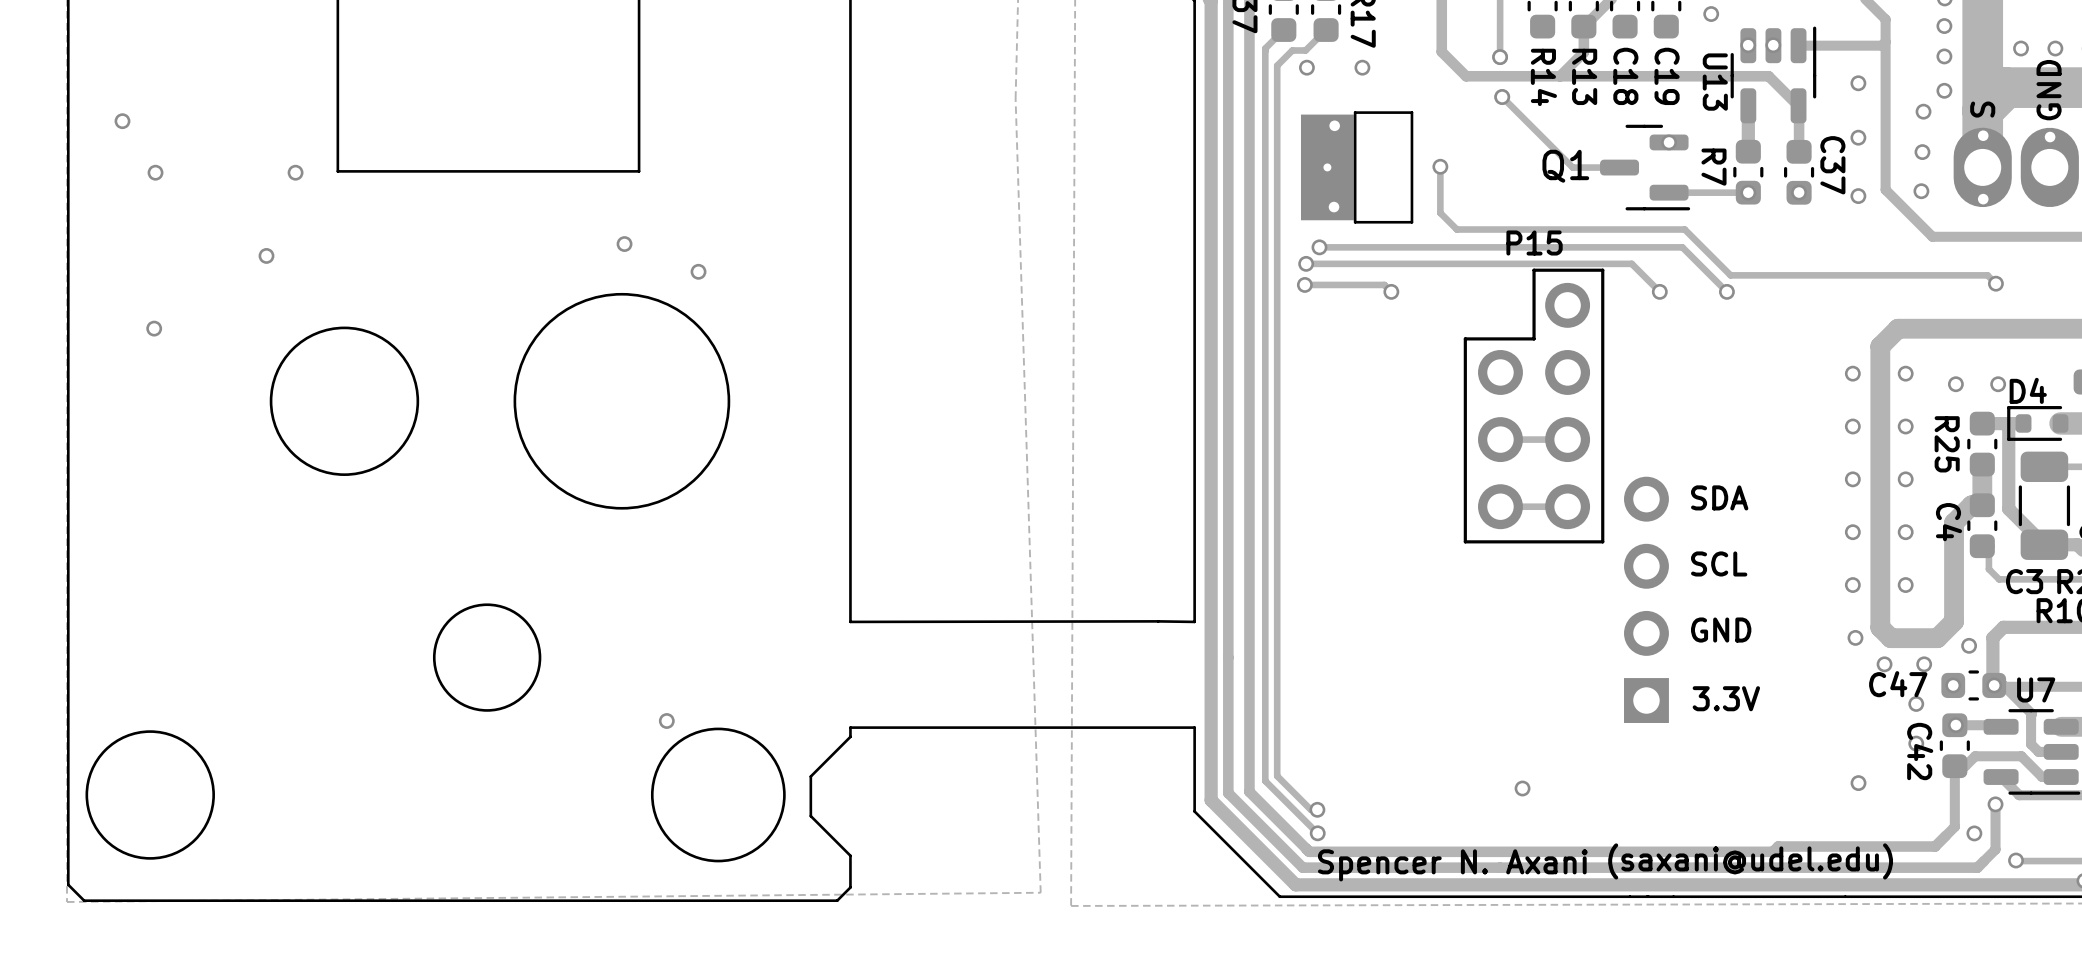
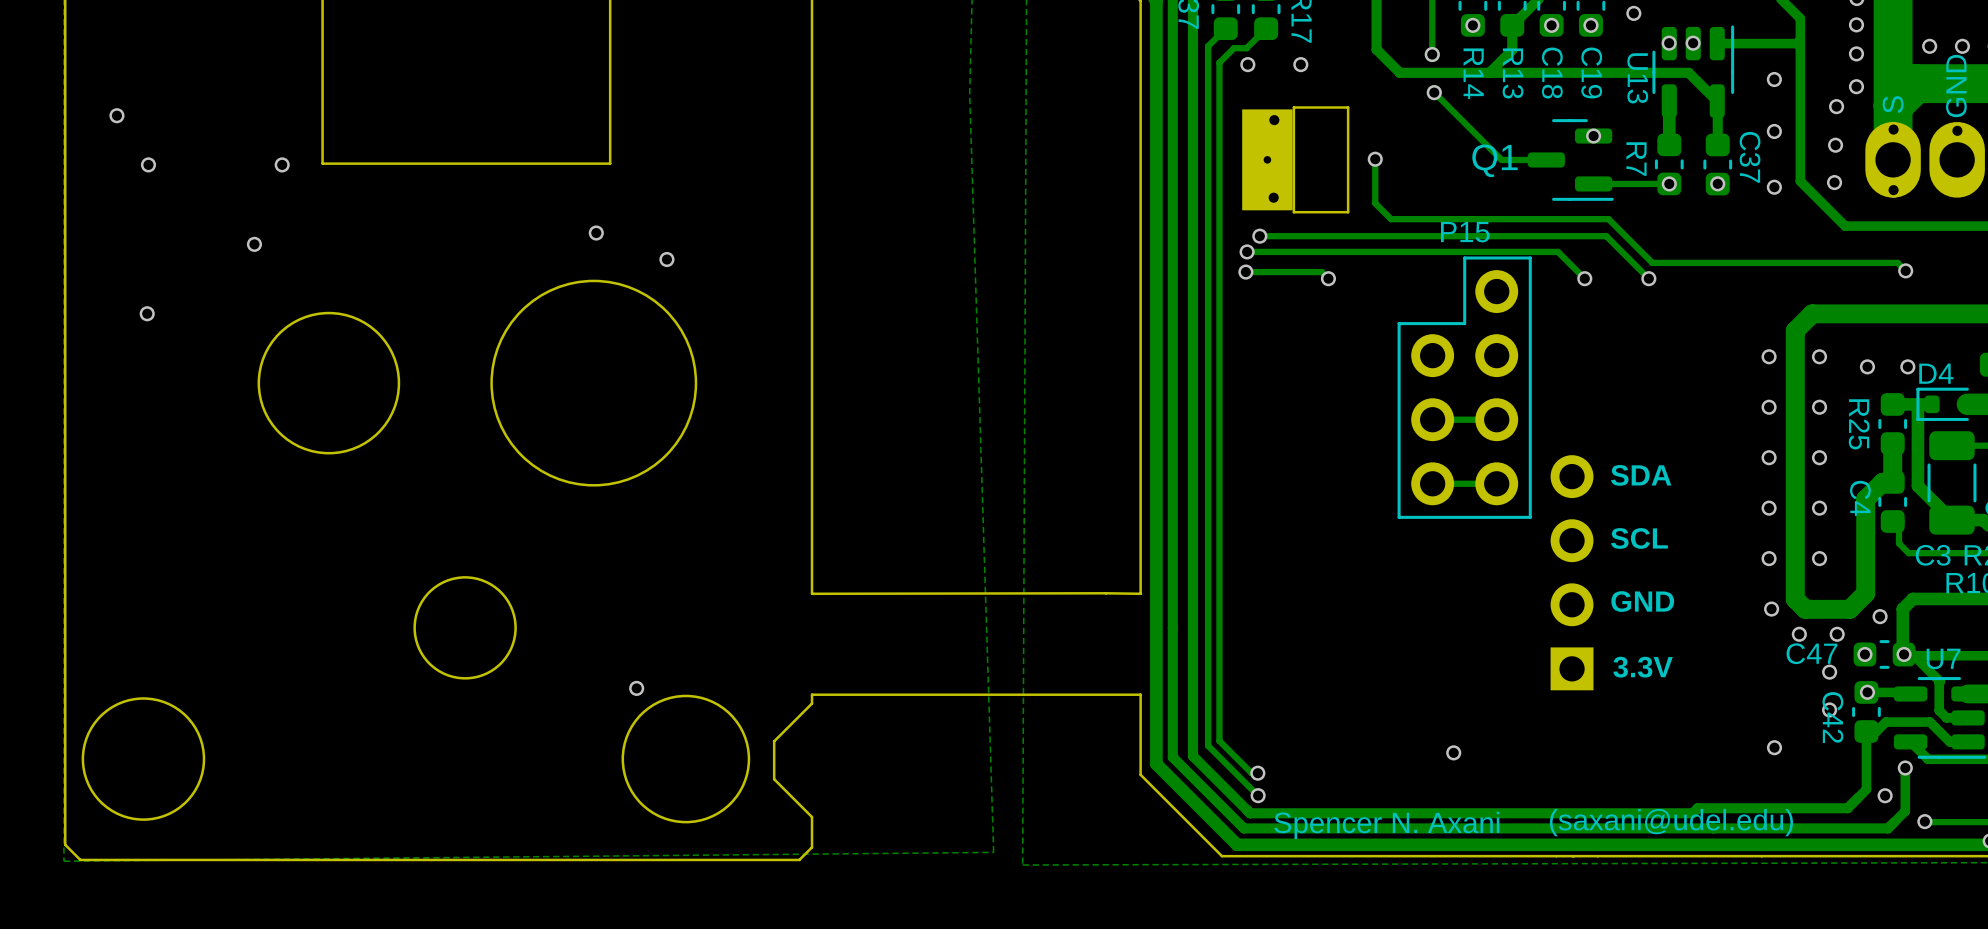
via: none -> (1472, 25)
via: none -> (1551, 25)
via: none -> (1590, 25)

